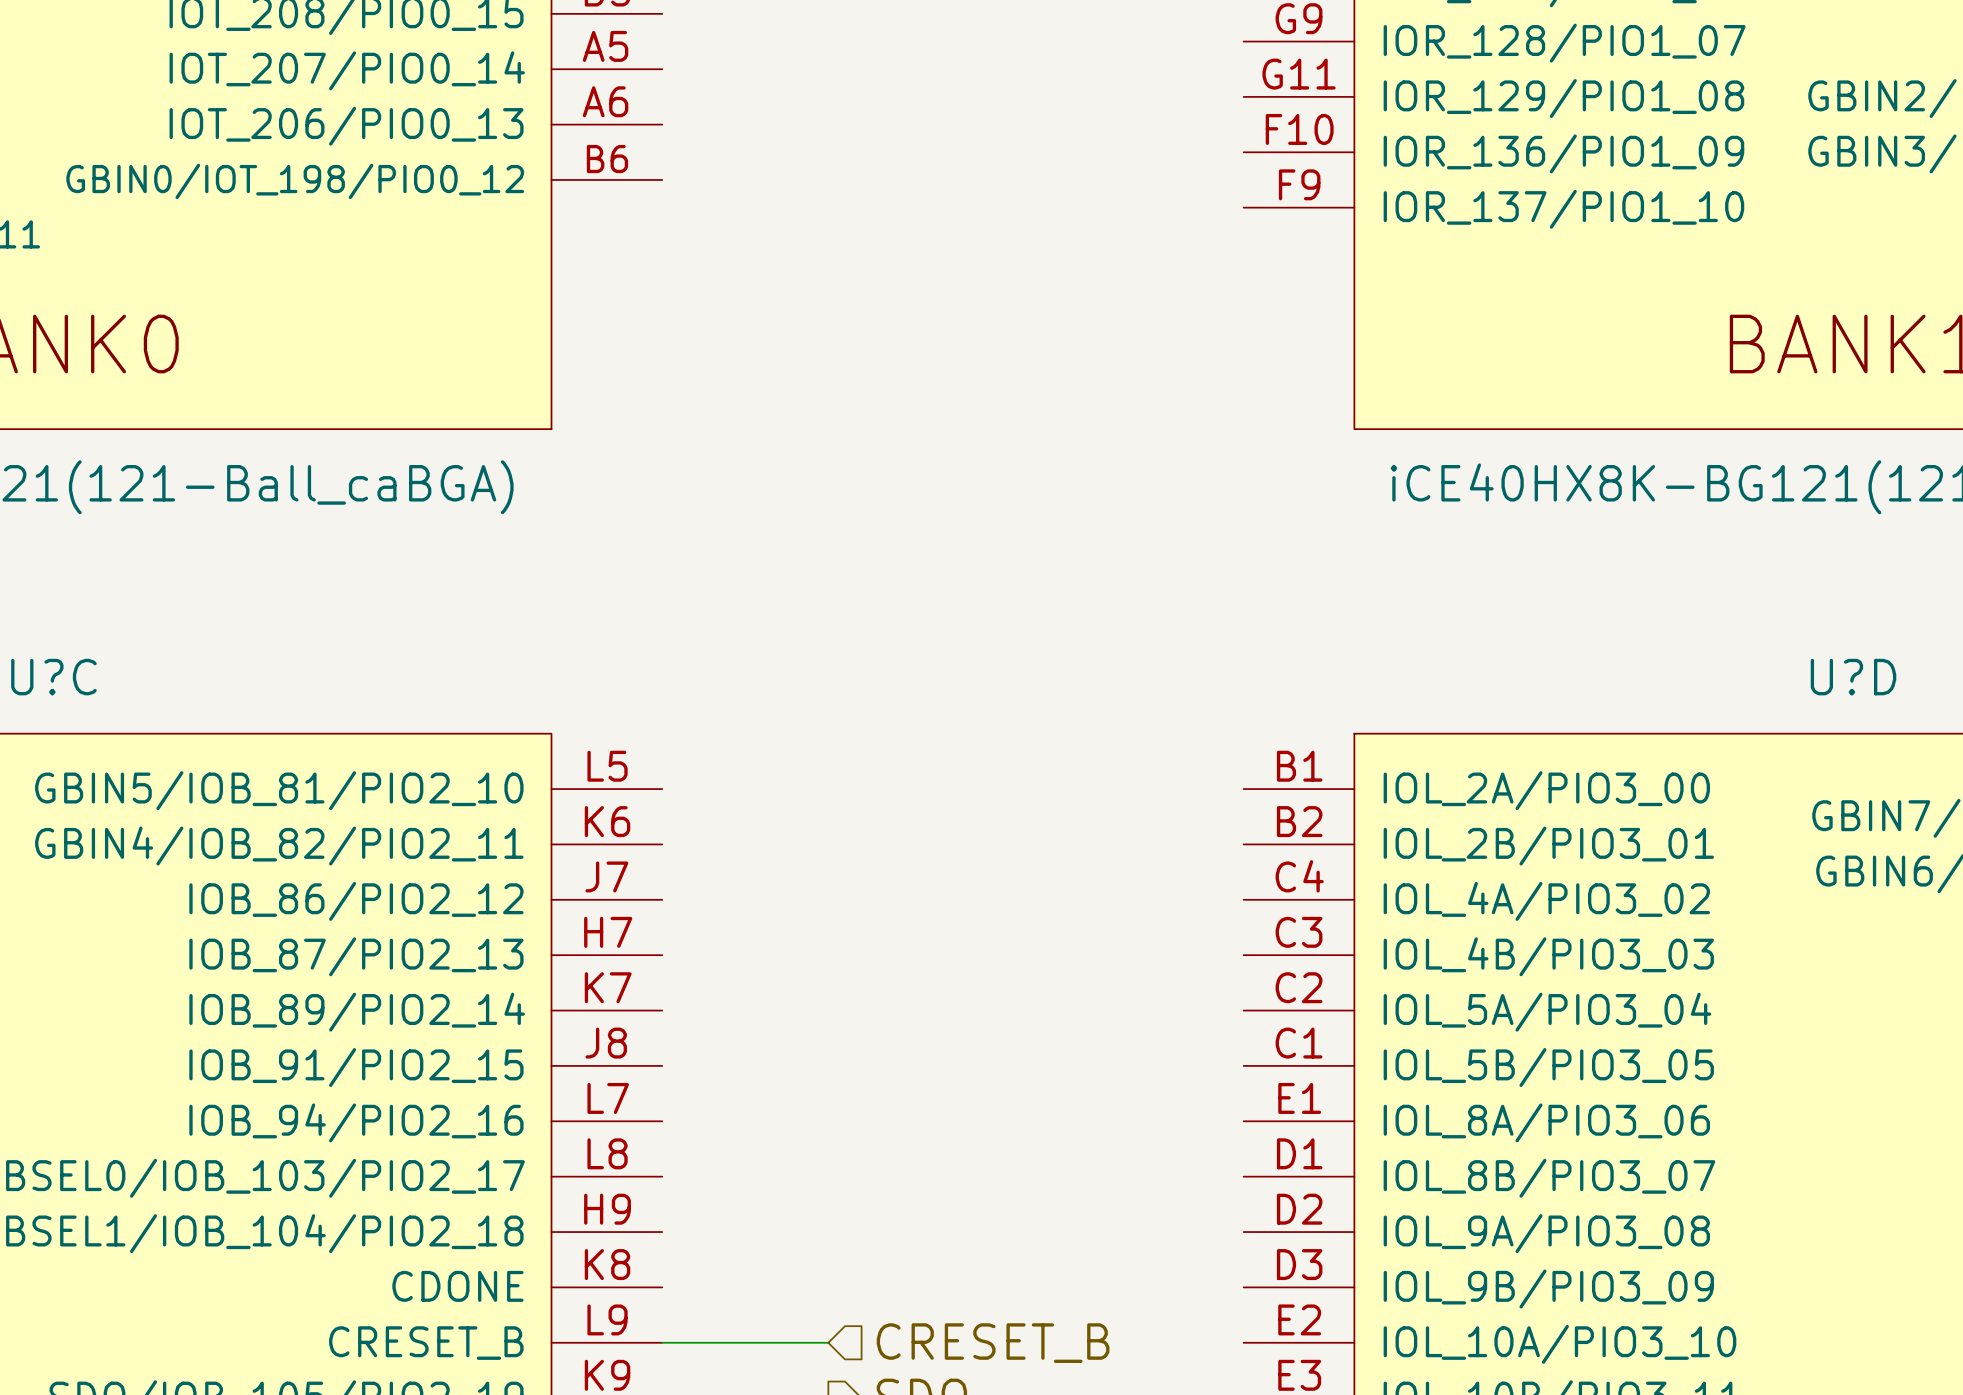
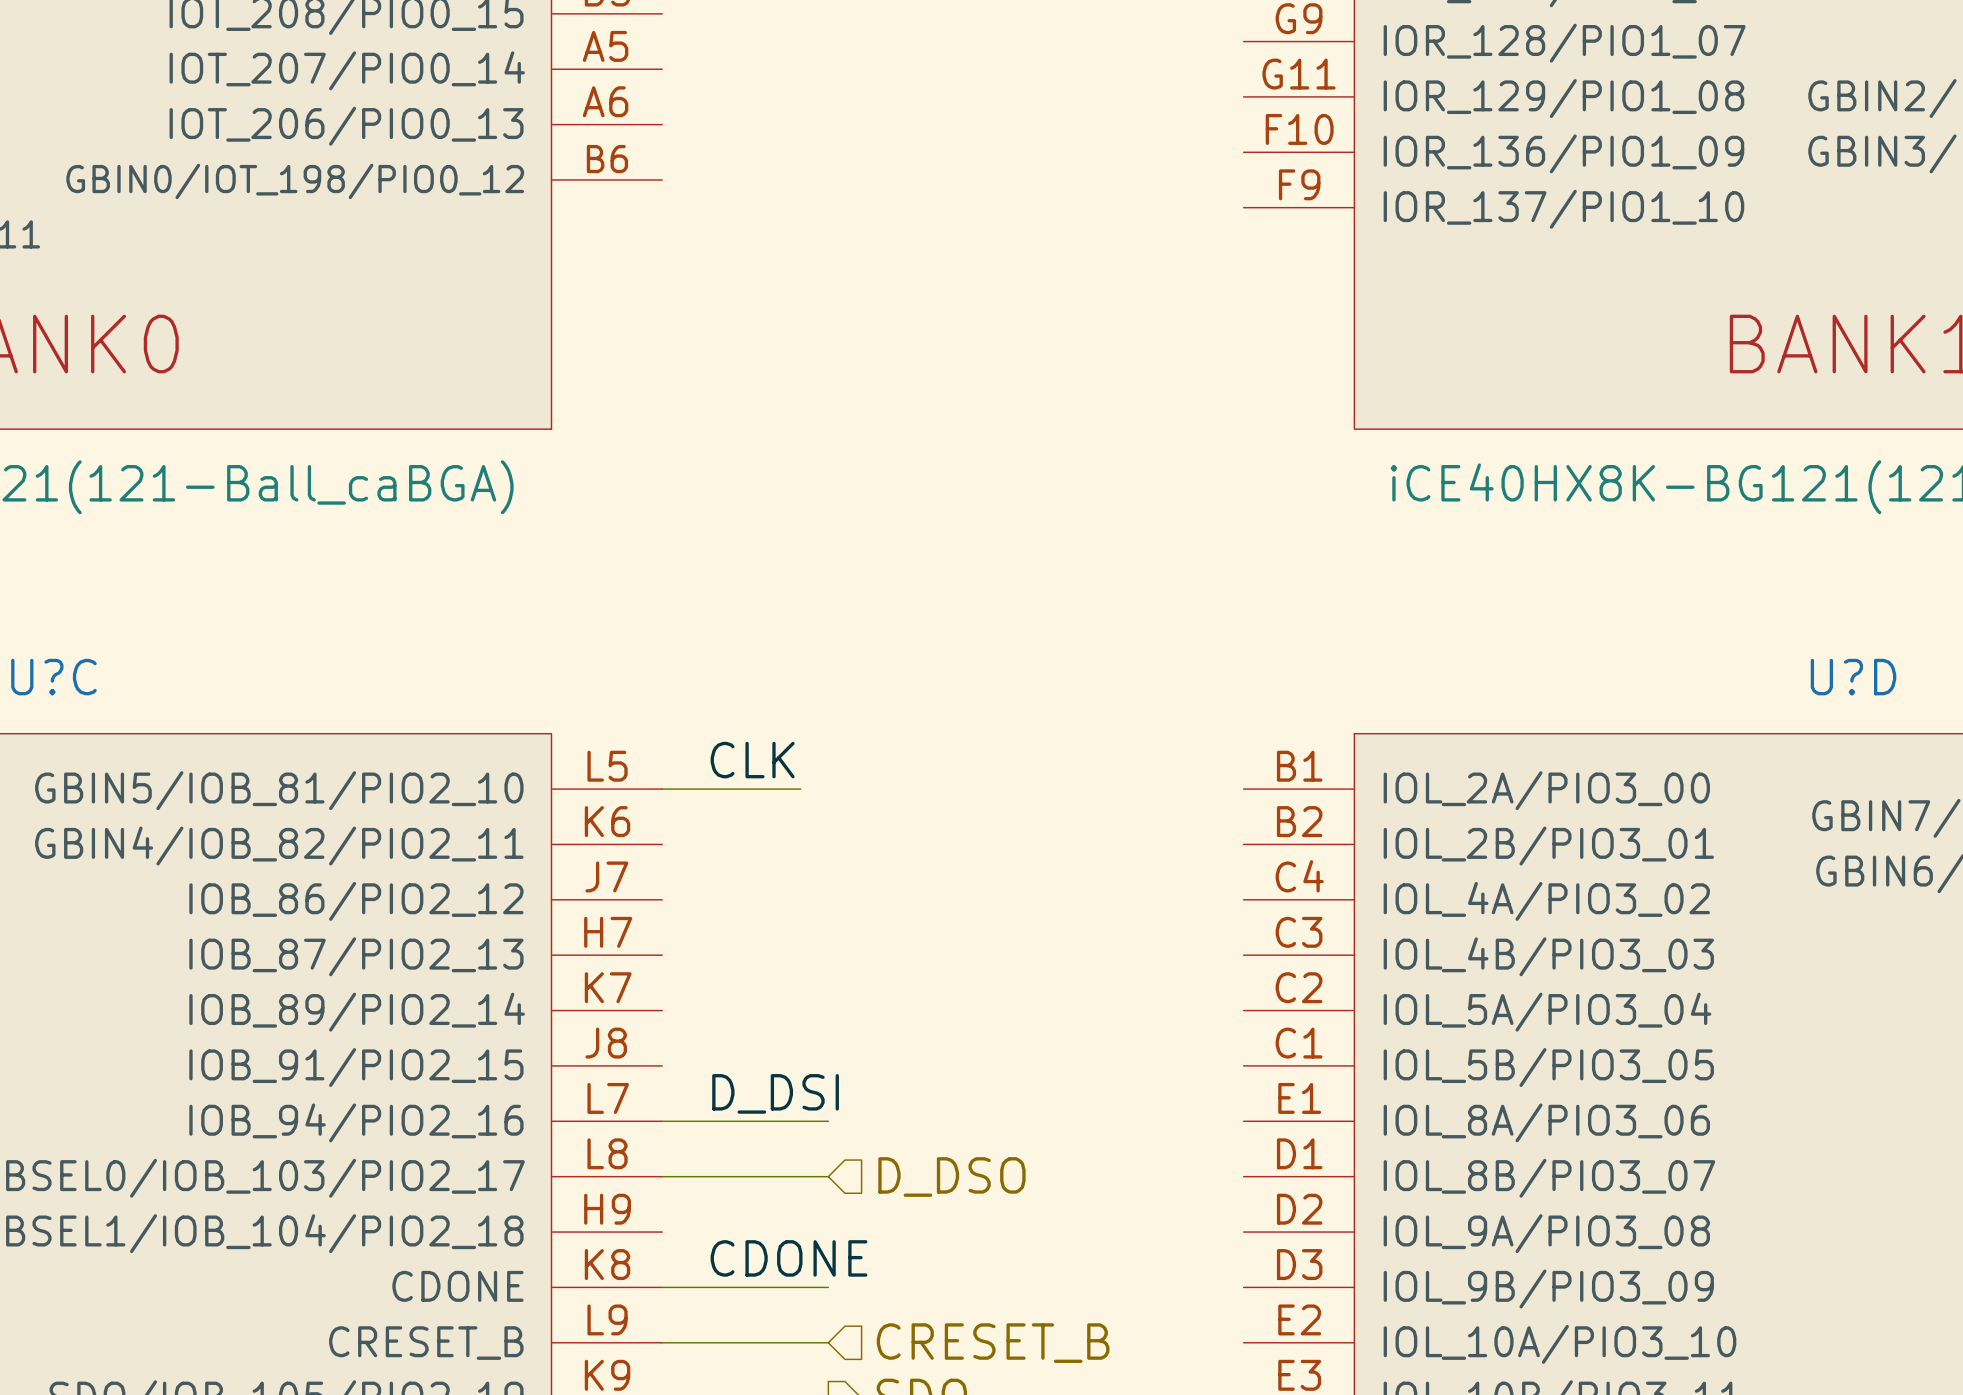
label: none -> CLK (752, 760)
wire: none -> (662, 789) (800, 789)
label: none -> D_DSI (775, 1093)
wire: none -> (662, 1121) (828, 1121)
wire: none -> (662, 1176) (828, 1176)
hierarchical label: none -> D_DSO (951, 1177)
label: none -> CDONE (789, 1258)
wire: none -> (662, 1287) (828, 1287)

